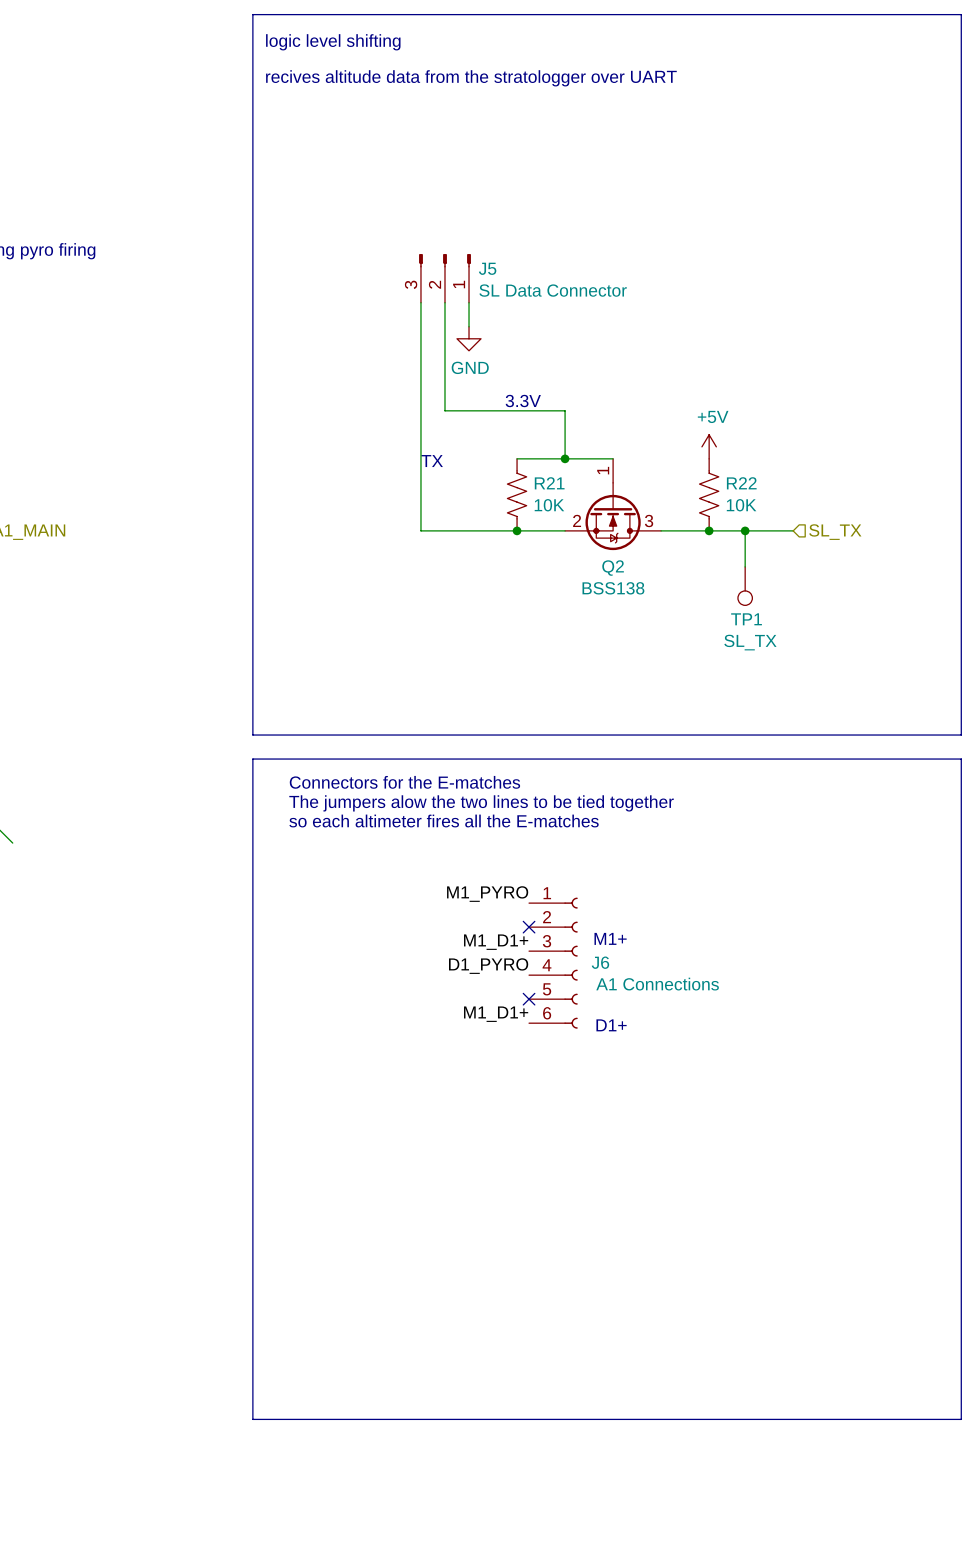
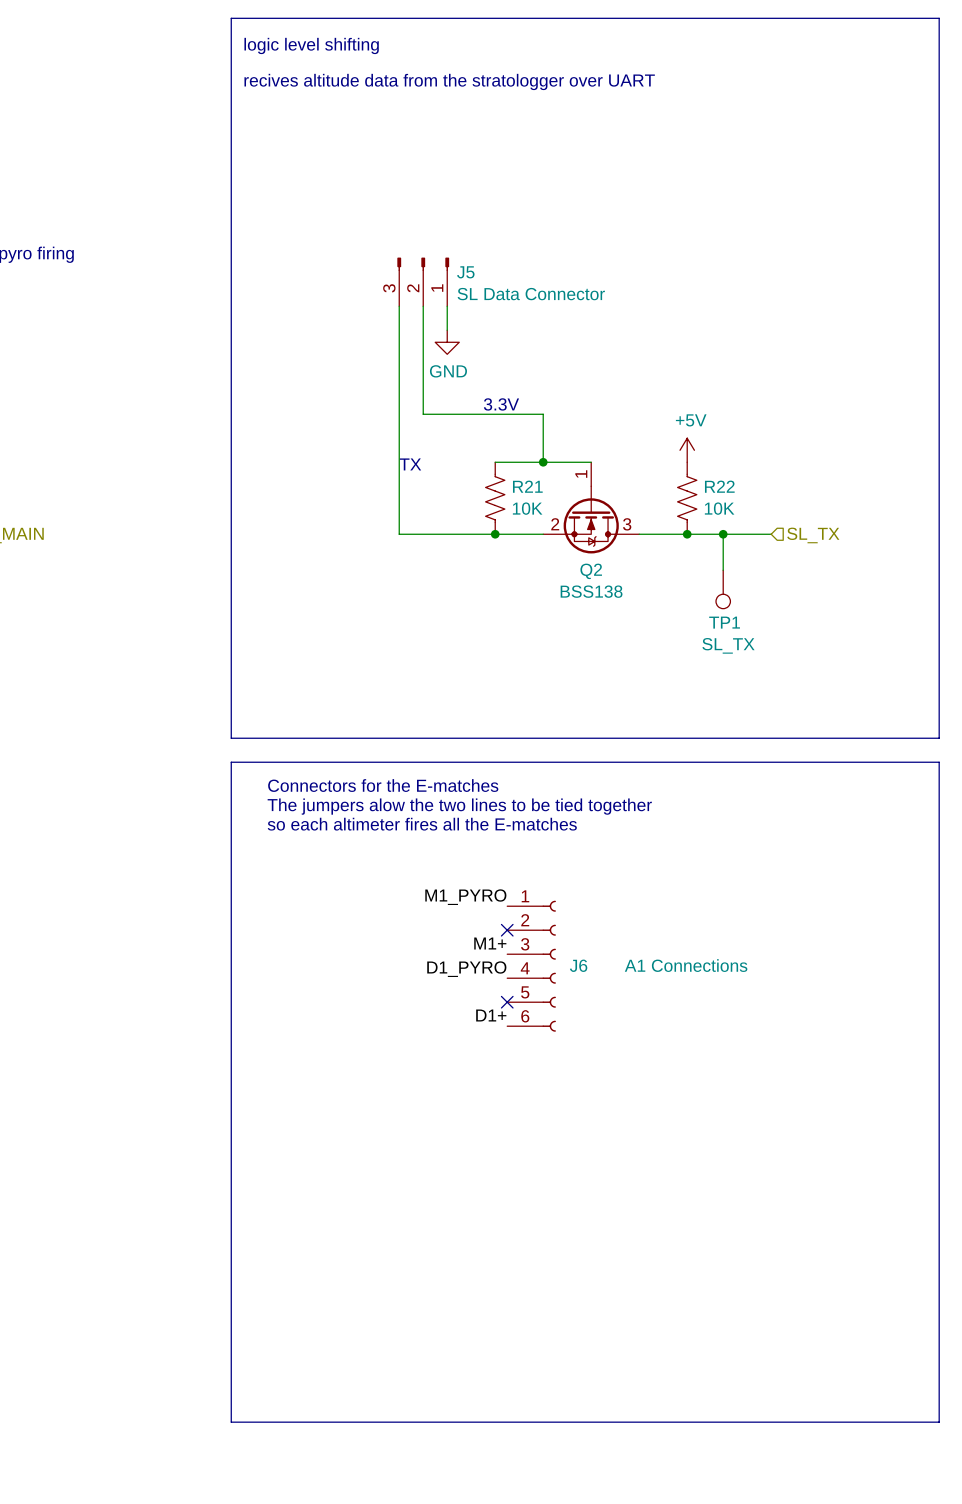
text: M1+ (610, 938) -> none
label: M1_D1+ (496, 942) -> M1+ (490, 943)
J6 value position: A1 Connections (657, 984) -> A1 Connections (686, 965)
label: M1_D1+ (496, 1014) -> D1+ (491, 1015)
text: D1+ (611, 1025) -> none

